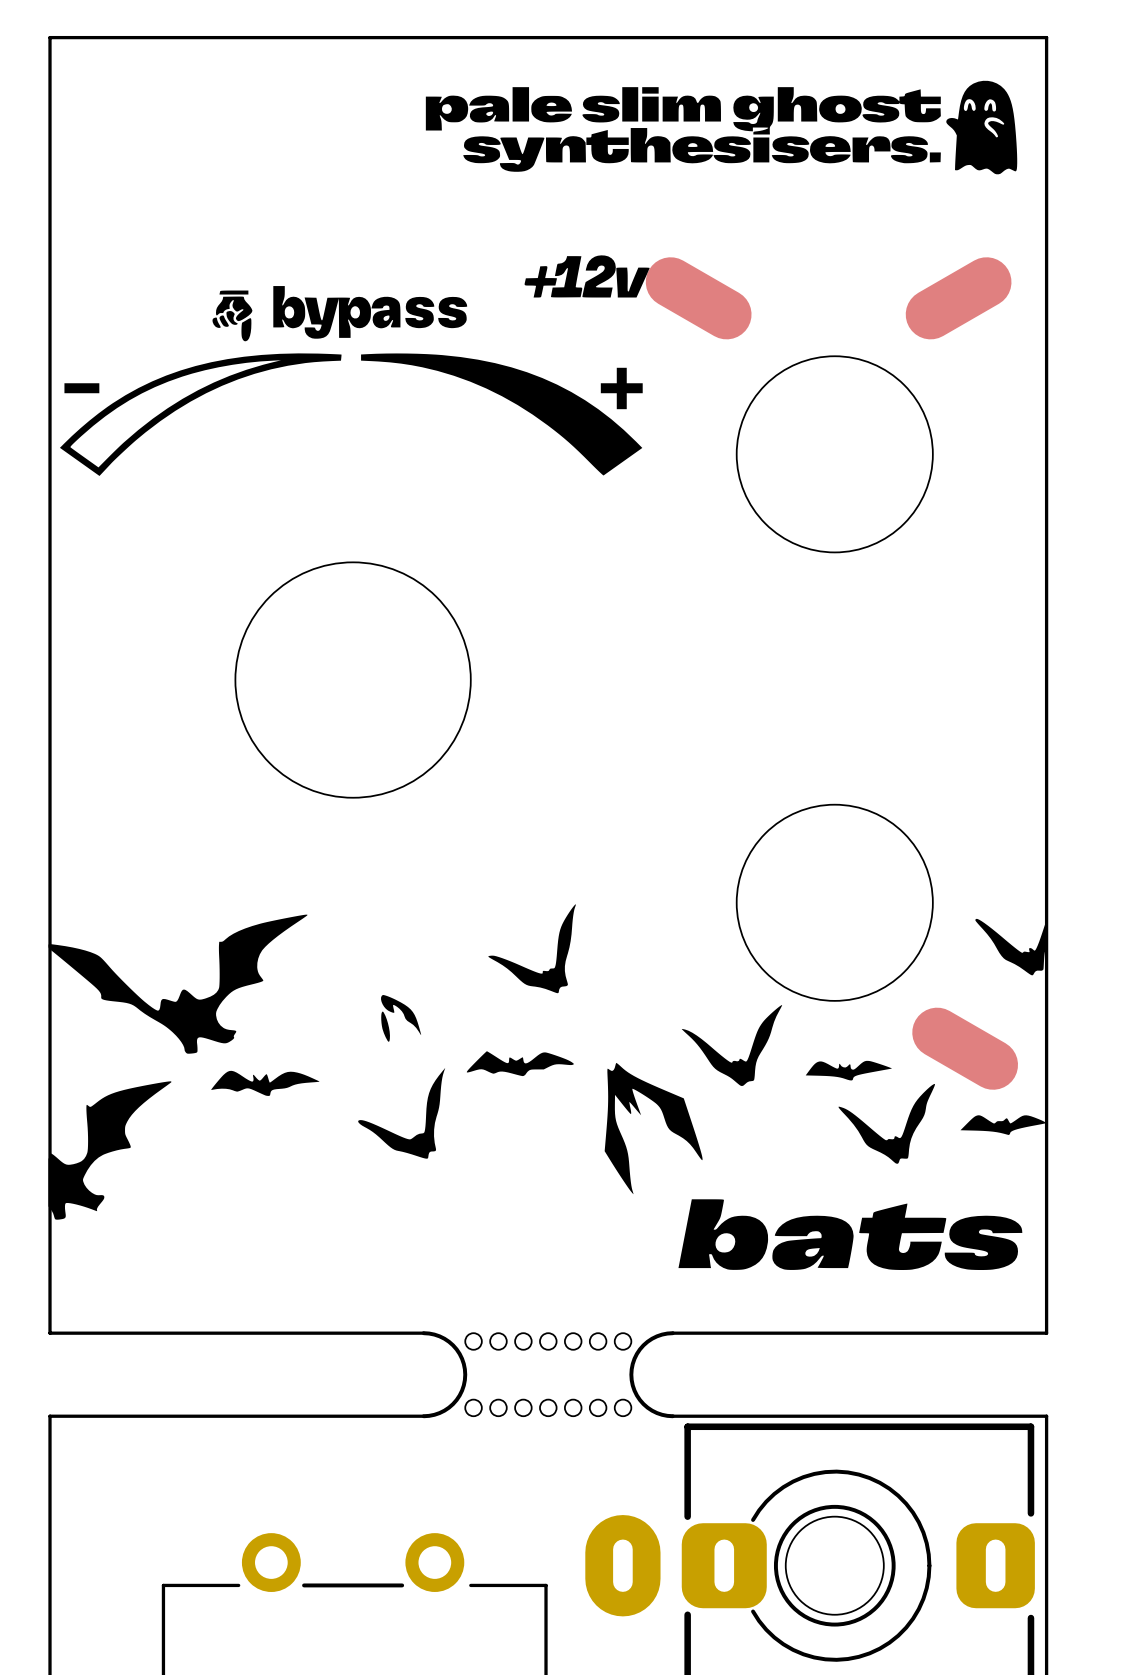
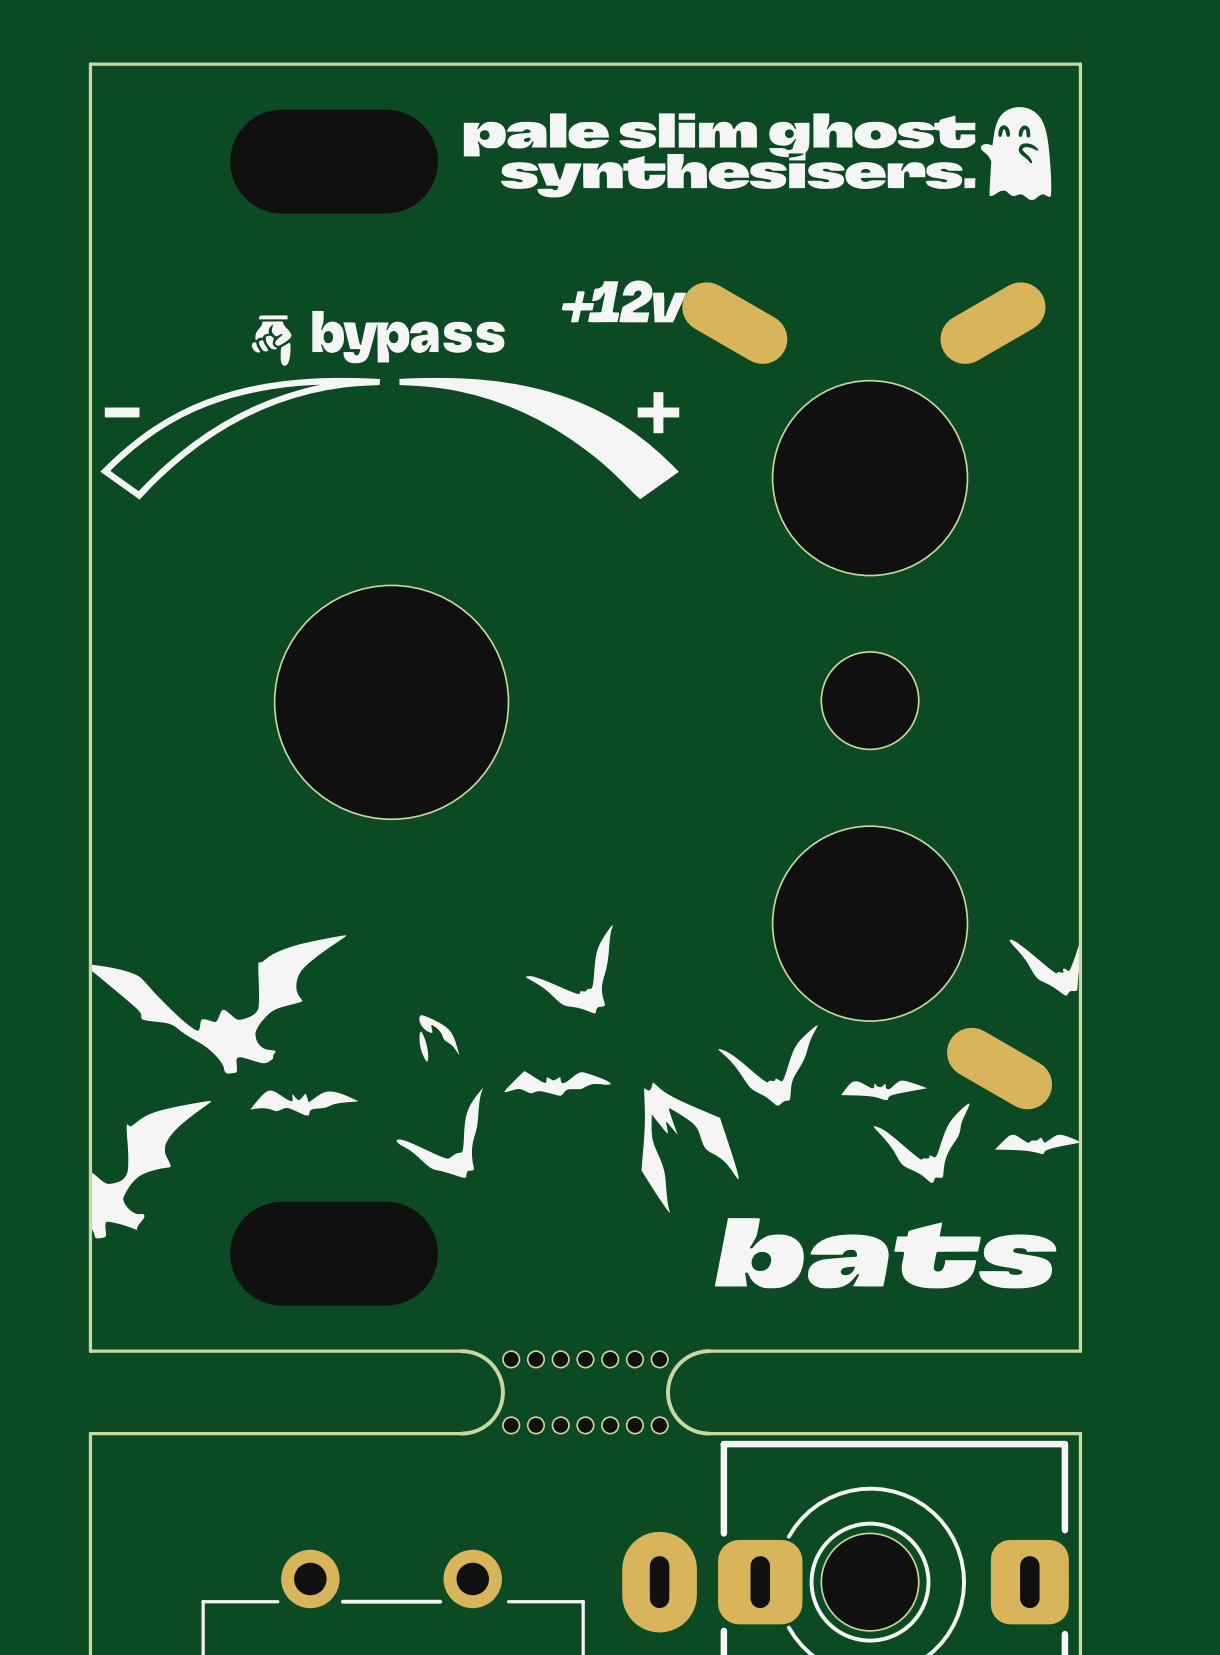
part: none -> (870, 700)

